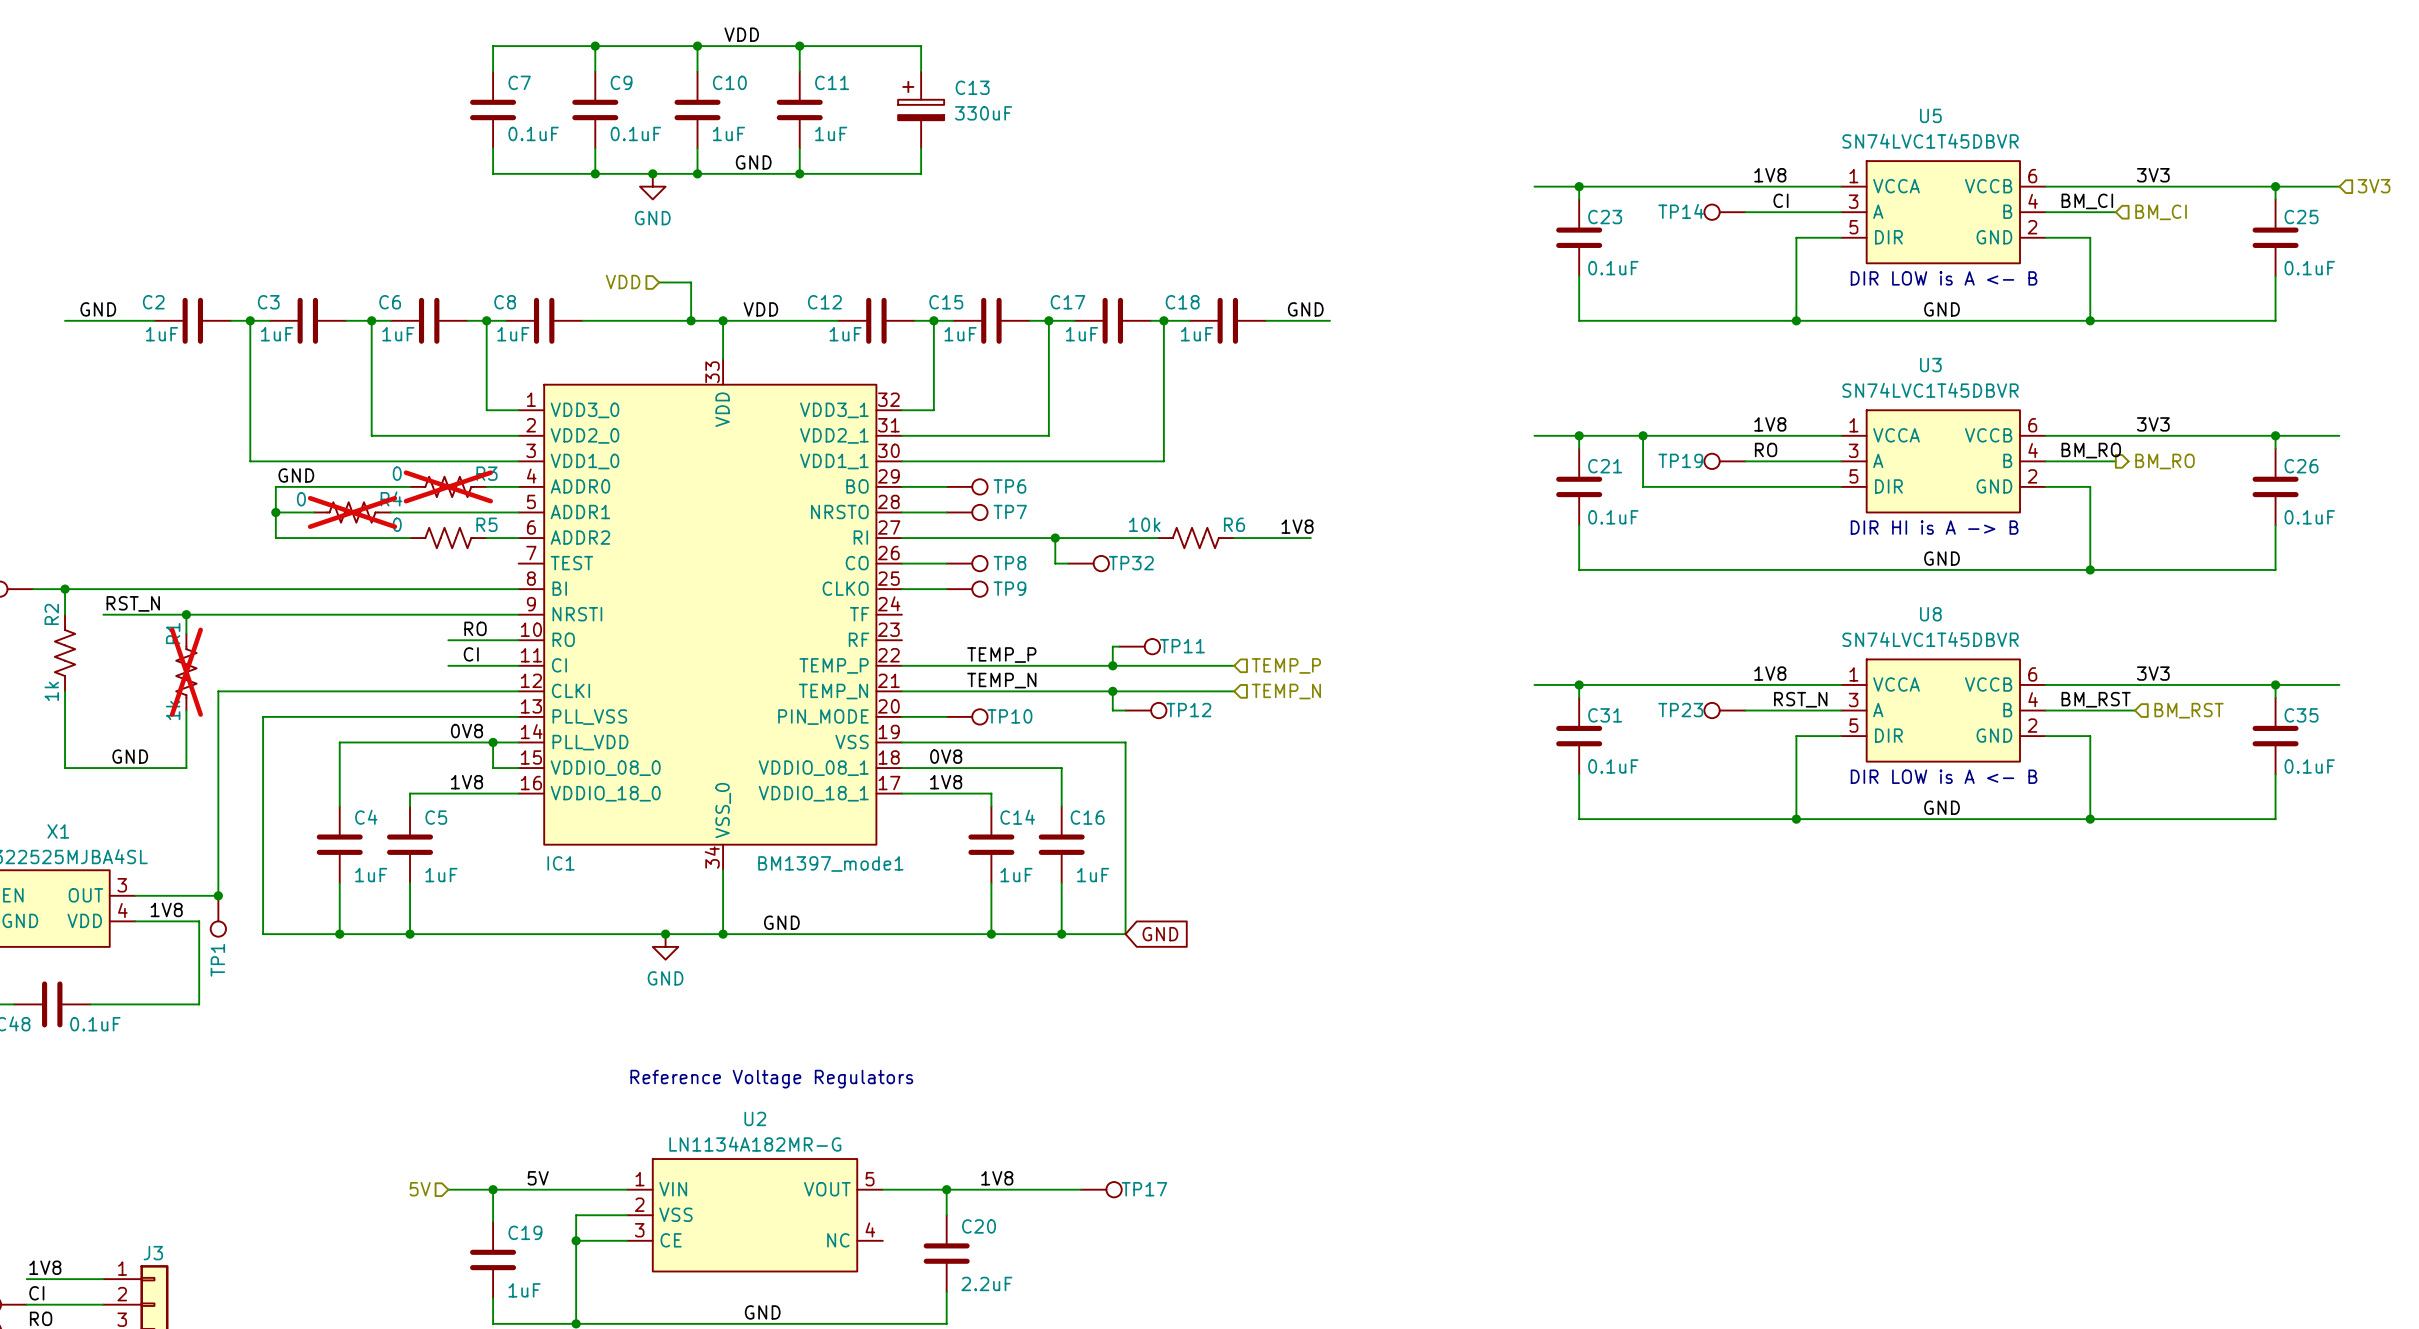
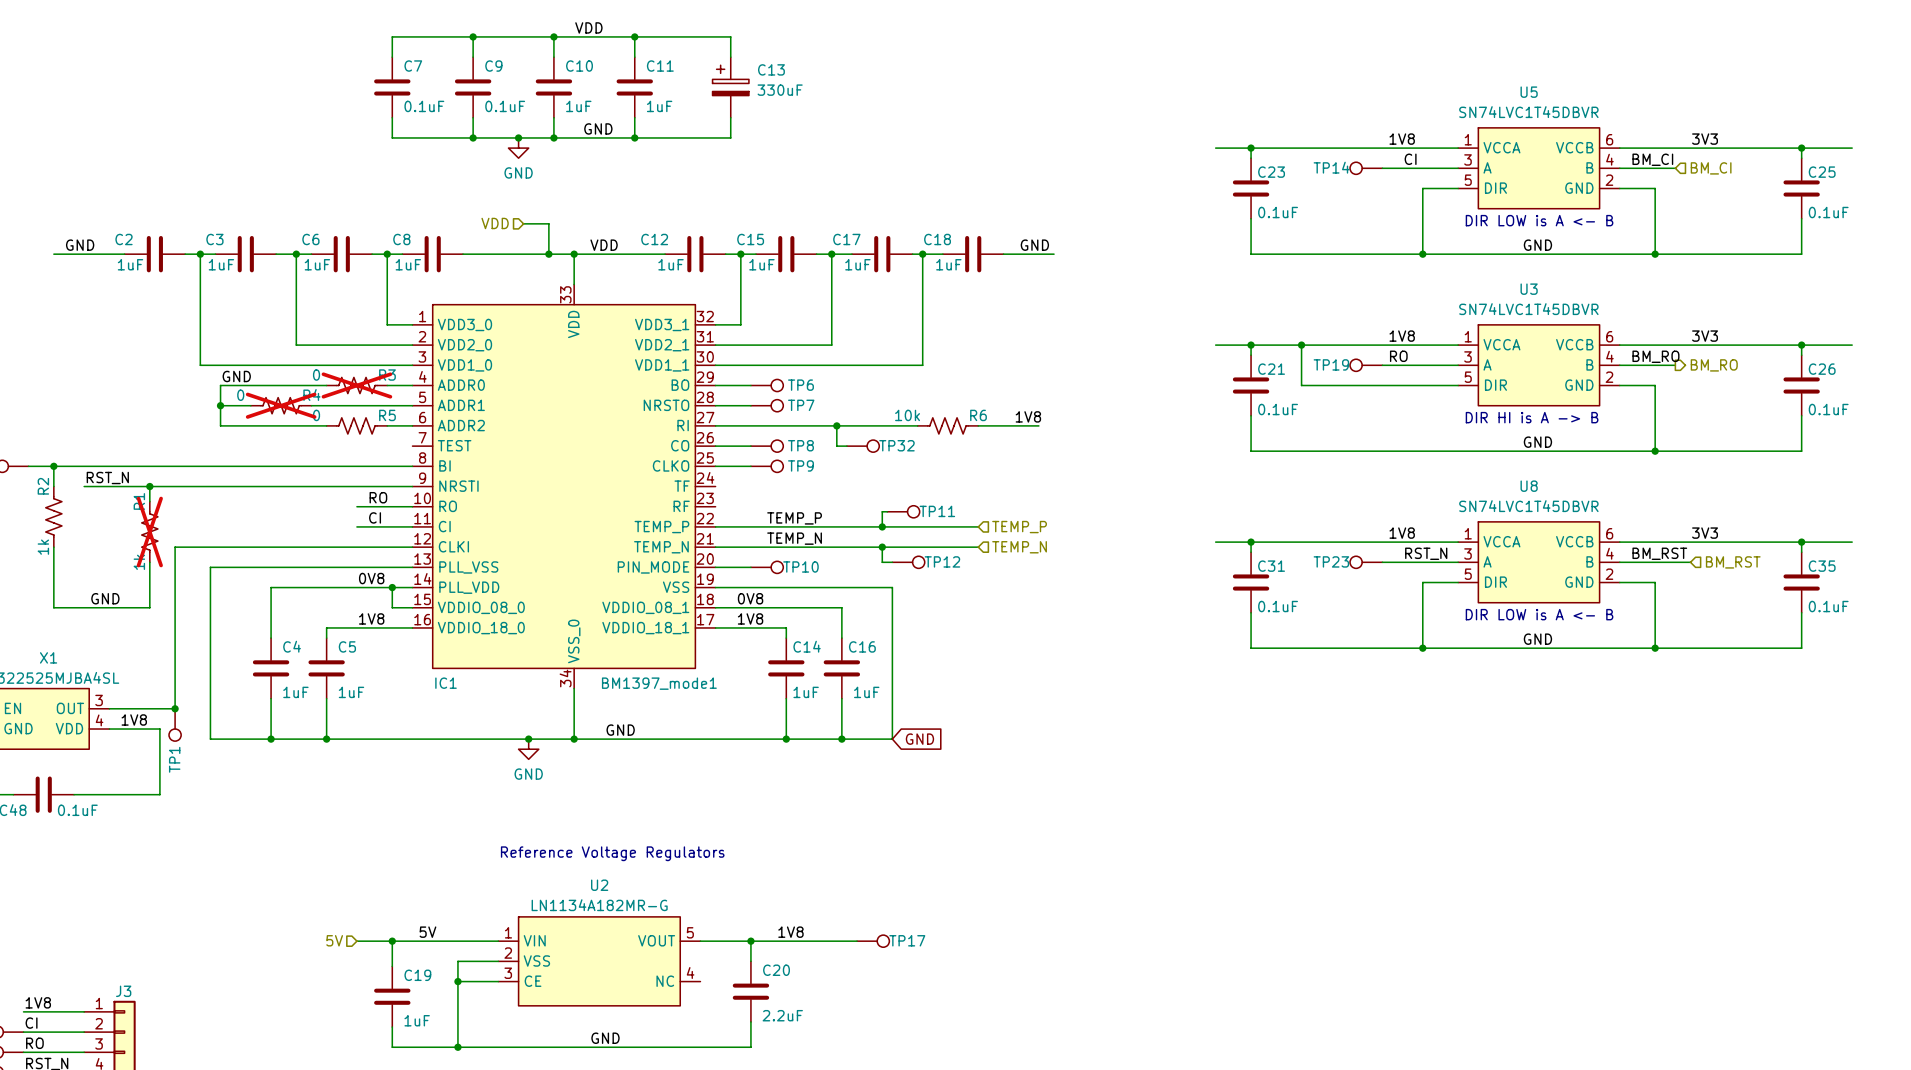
hierarchical label: 3V3 (2374, 186) -> none

